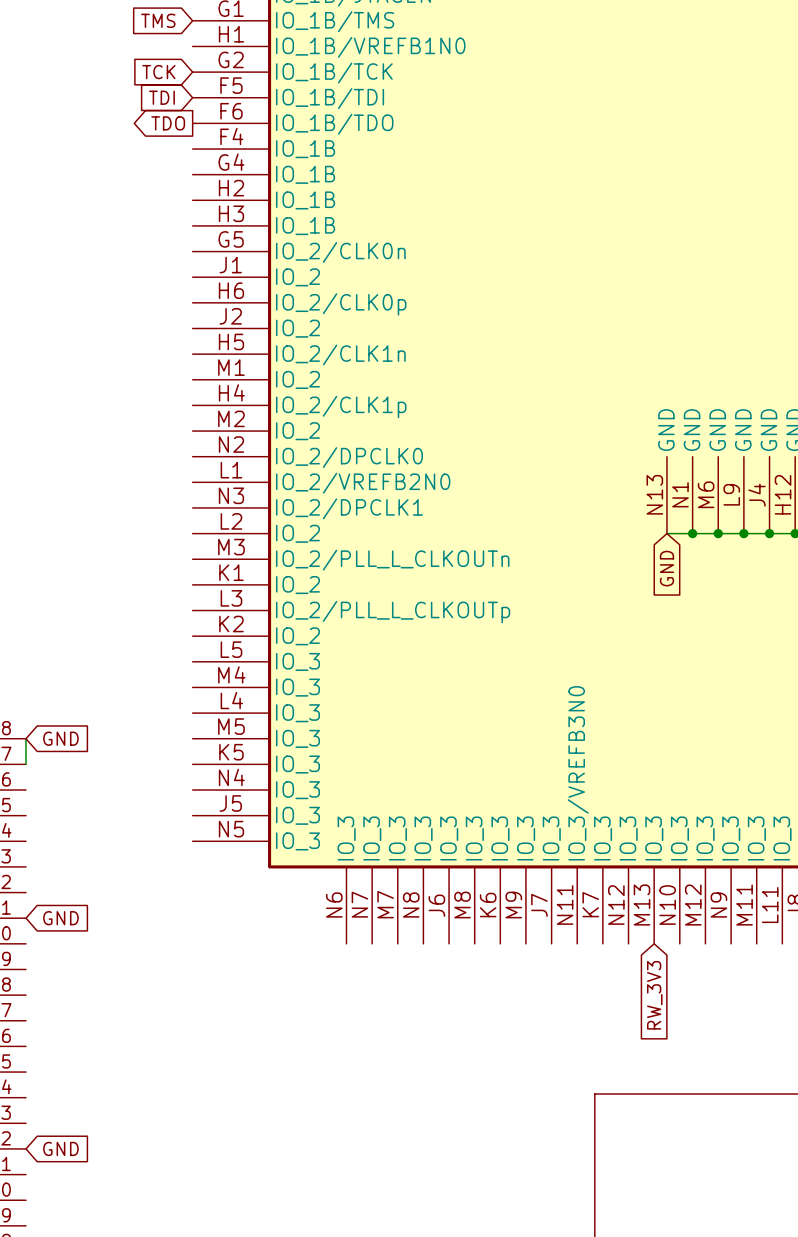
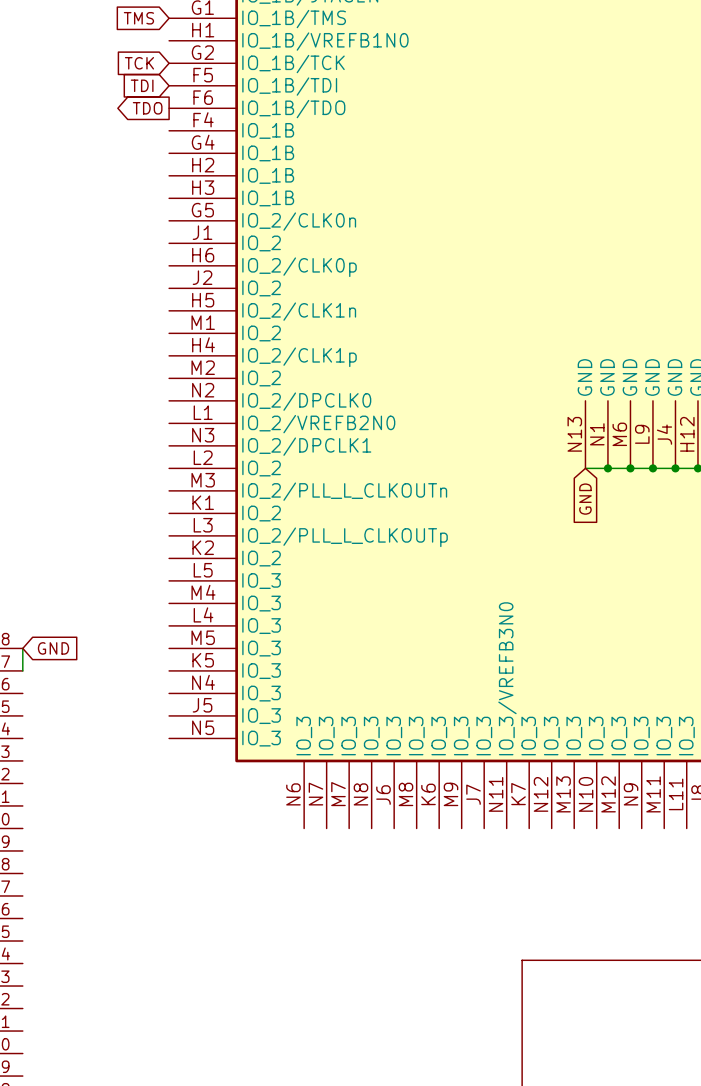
global label: GND (60, 918) -> none
global label: RW_3V3 (654, 995) -> none
global label: GND (60, 1148) -> none

